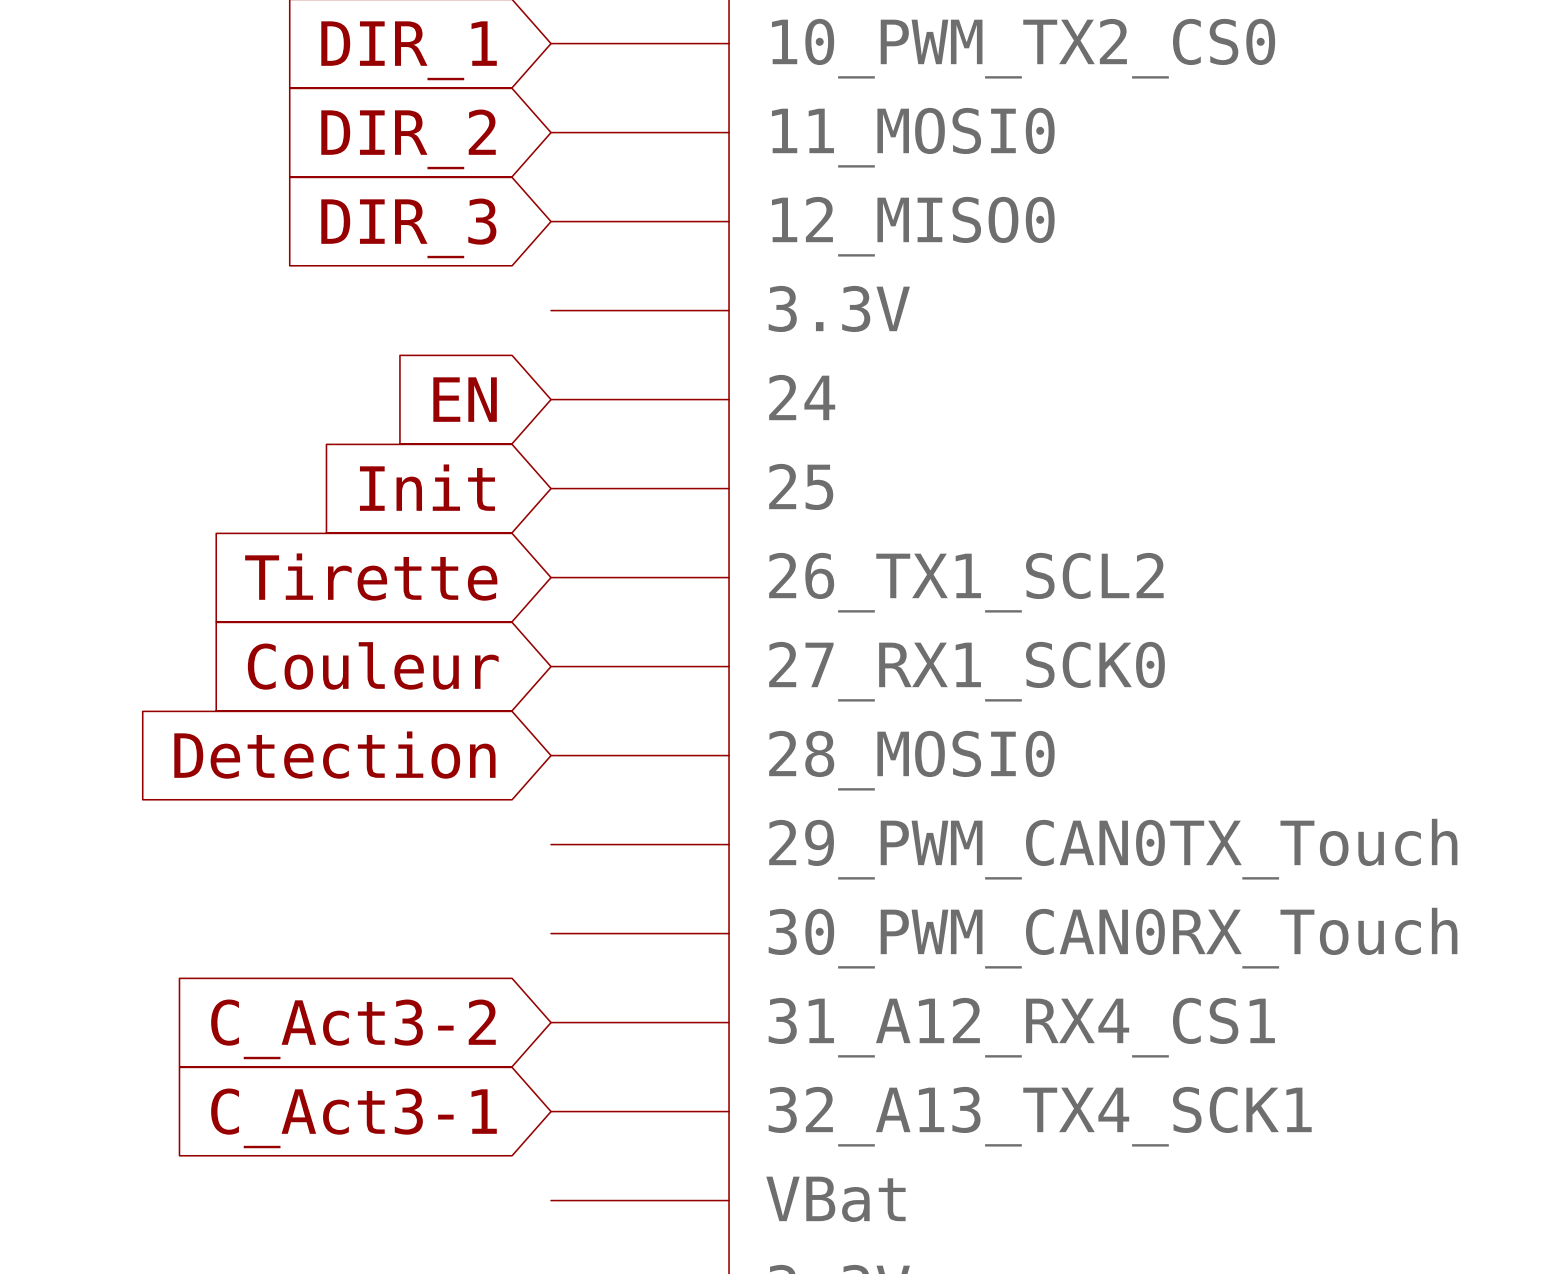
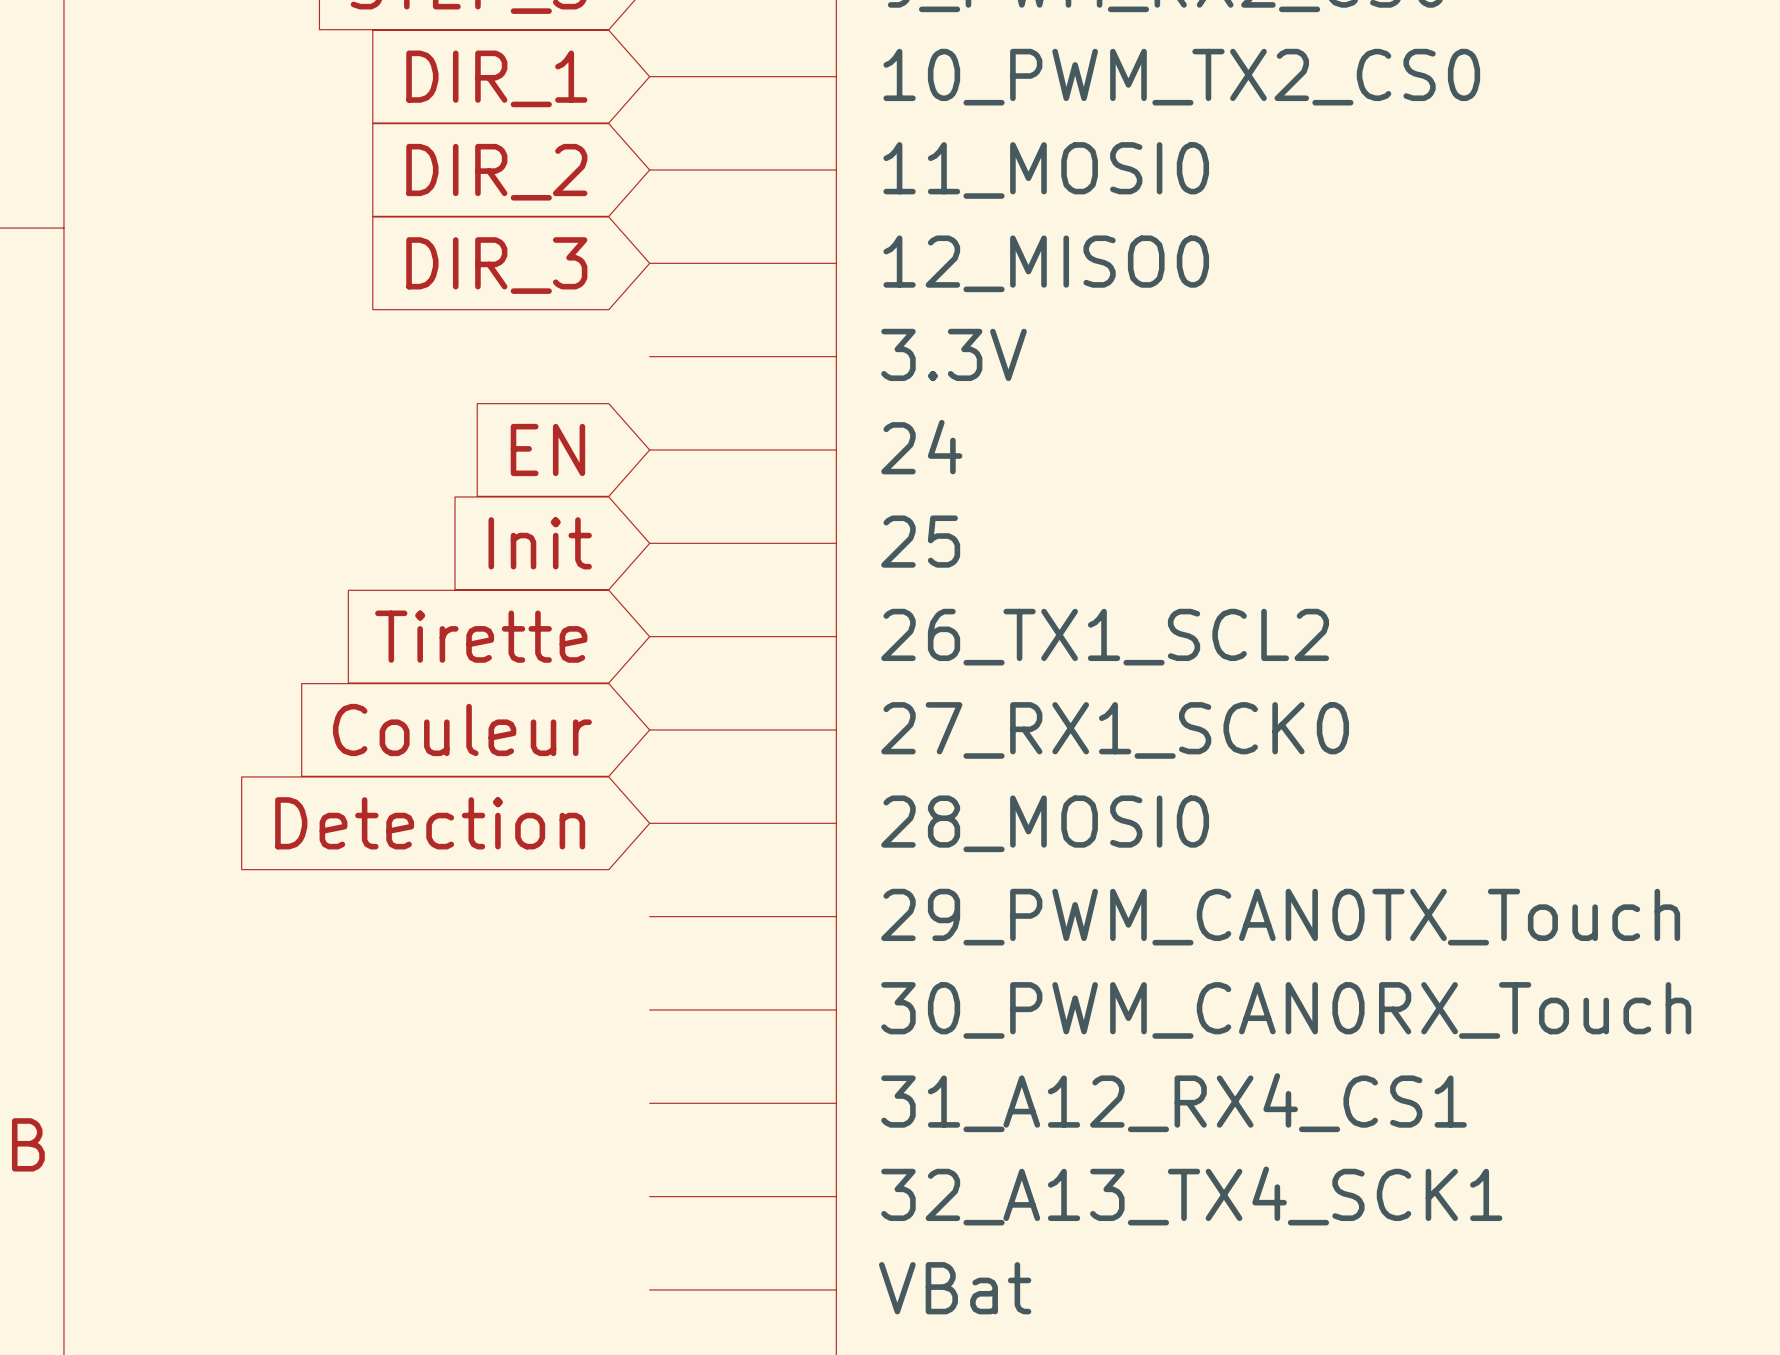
global label: C_Act3-2 (353, 1029) -> none
global label: C_Act3-1 (353, 1118) -> none

